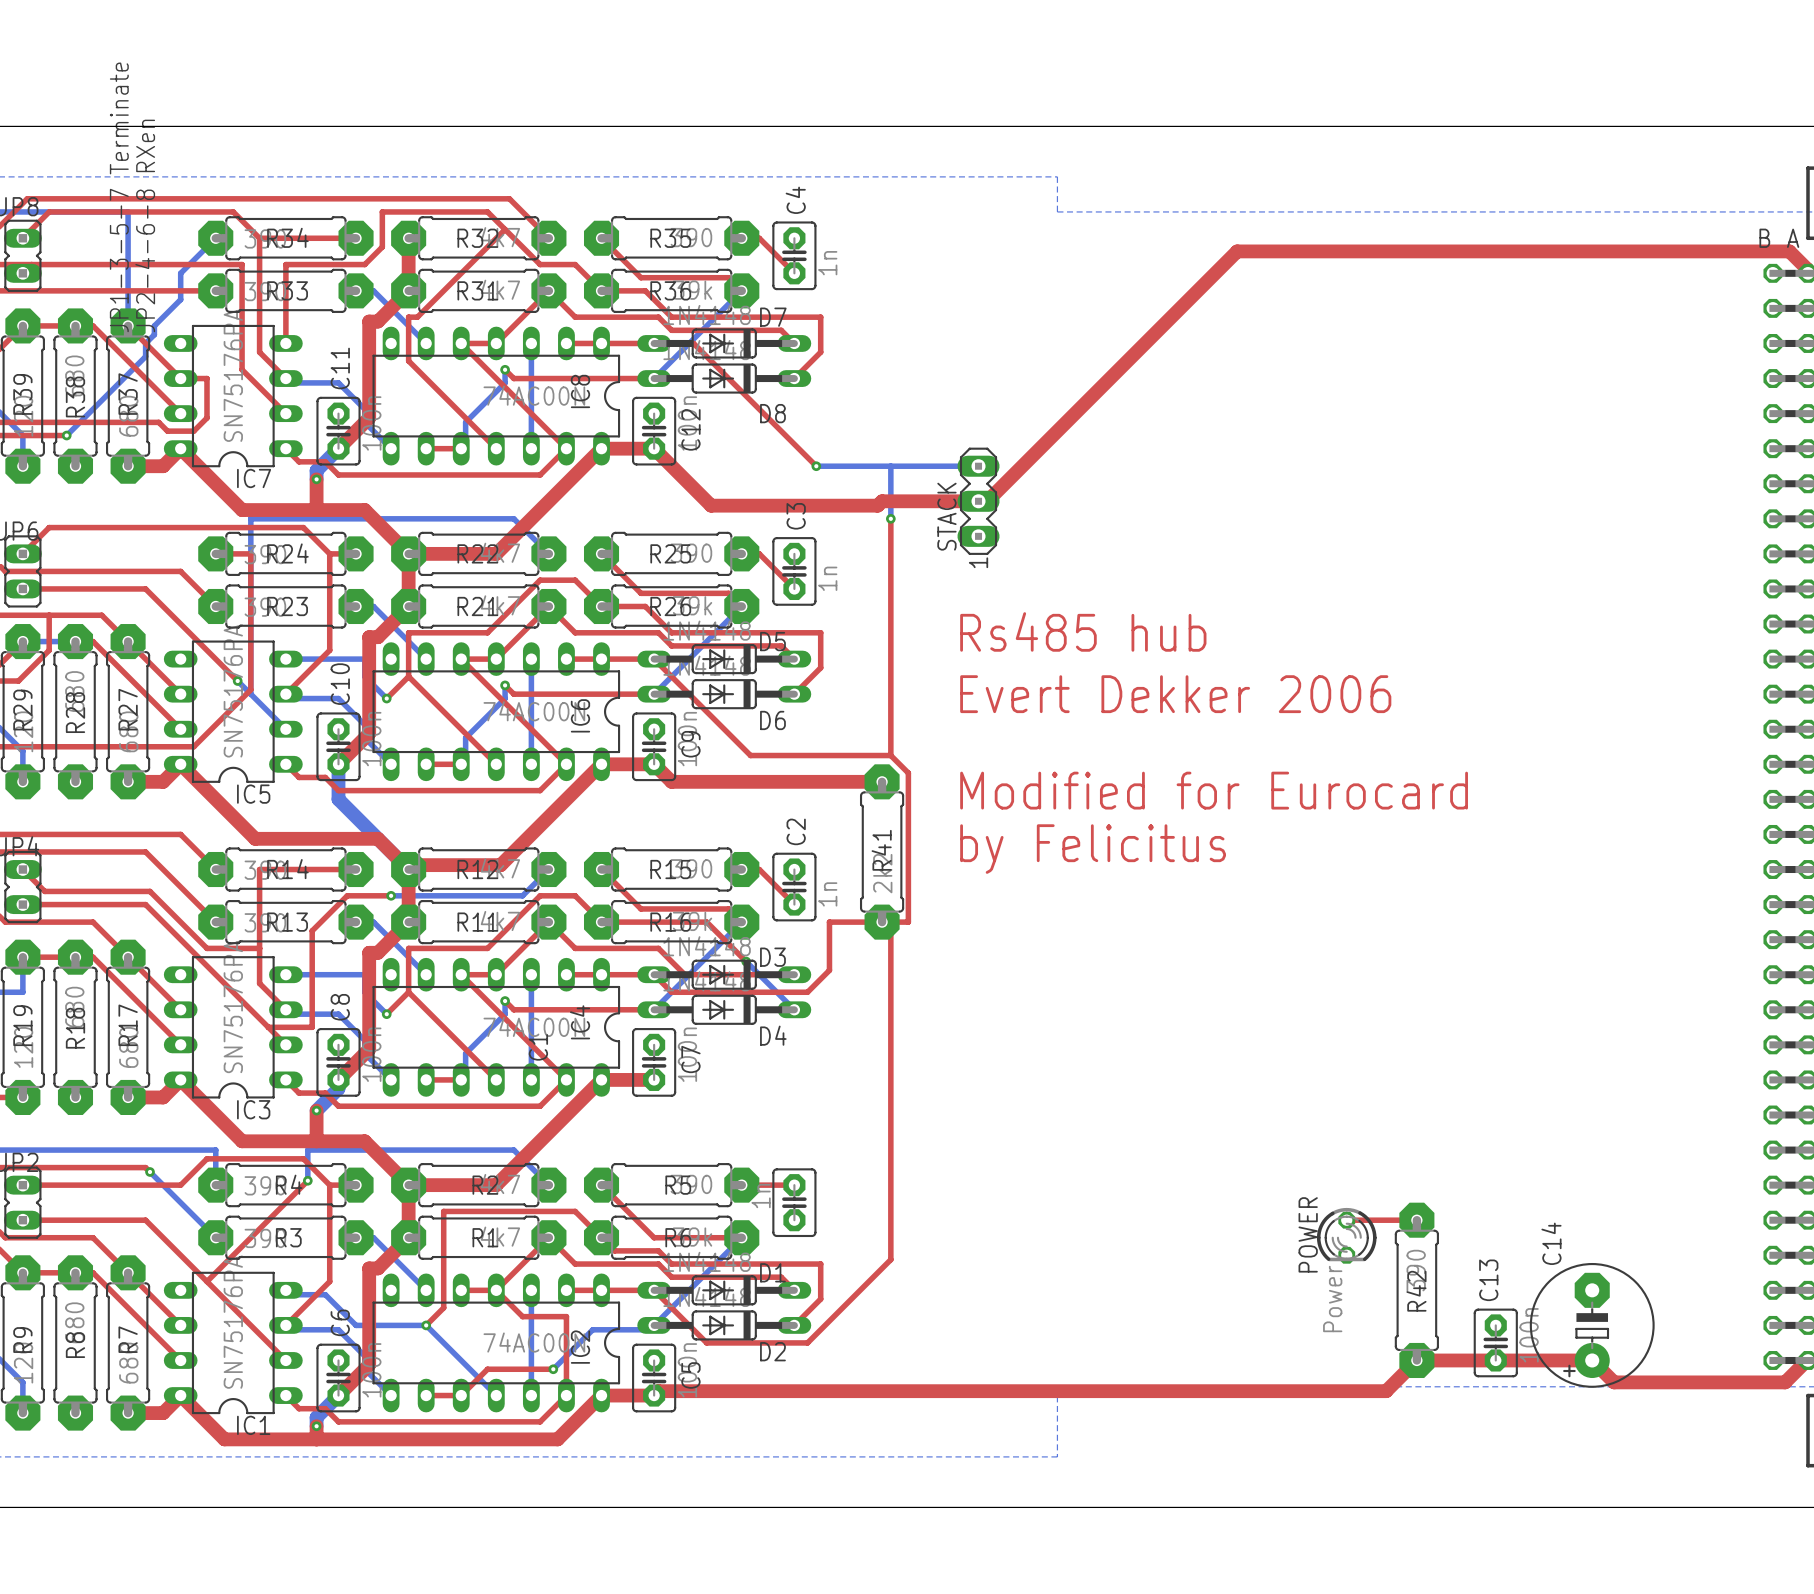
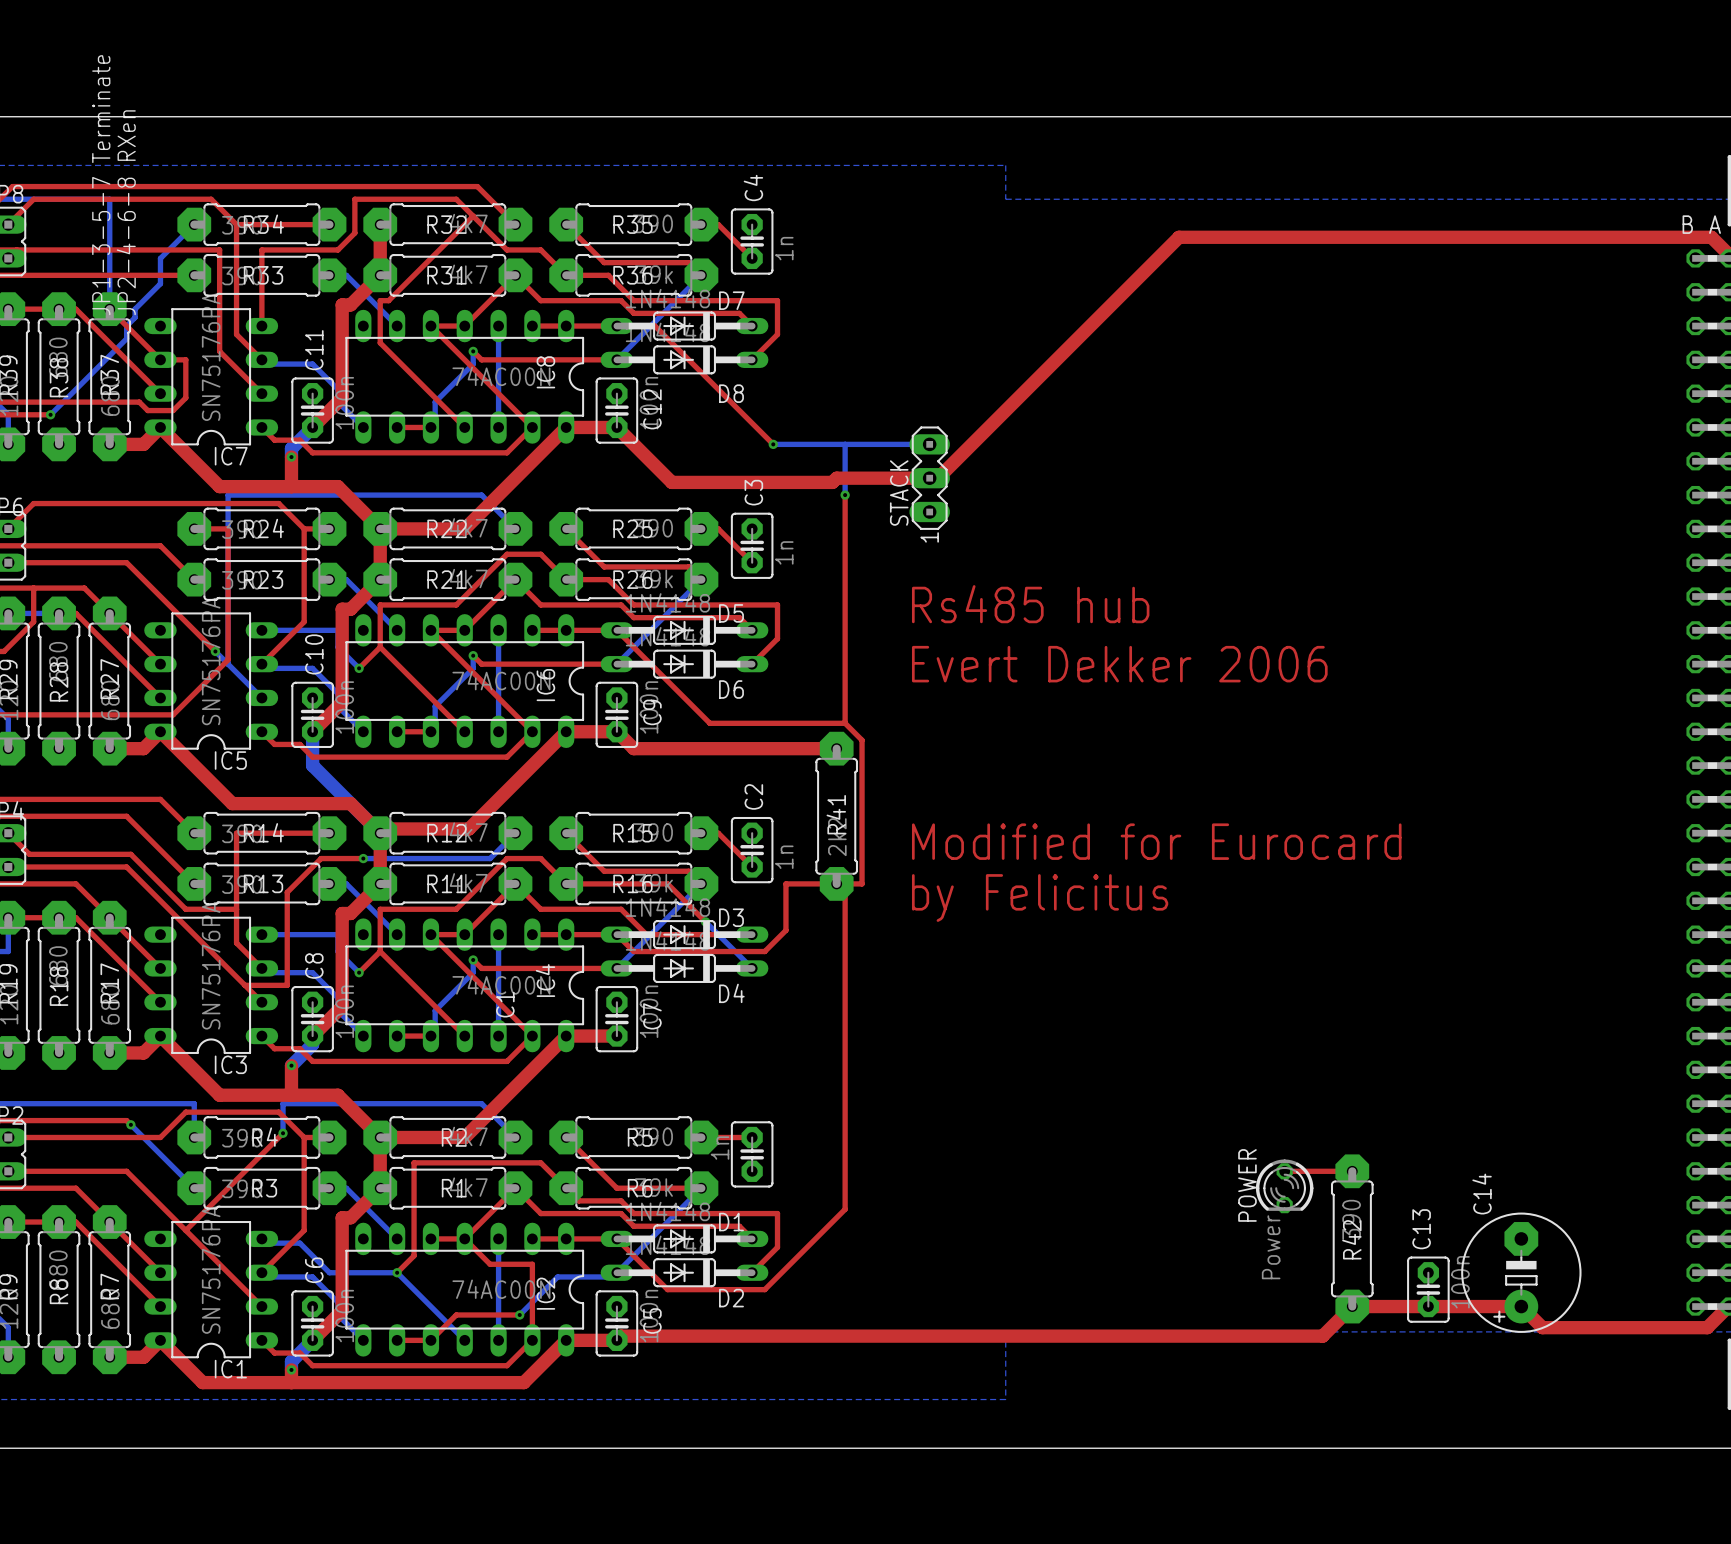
text position: Modified for Eurocard (1214, 790) -> Modified for Eurocard (1156, 841)
text position: by Felicitus (1093, 849) -> by Felicitus (1040, 898)

